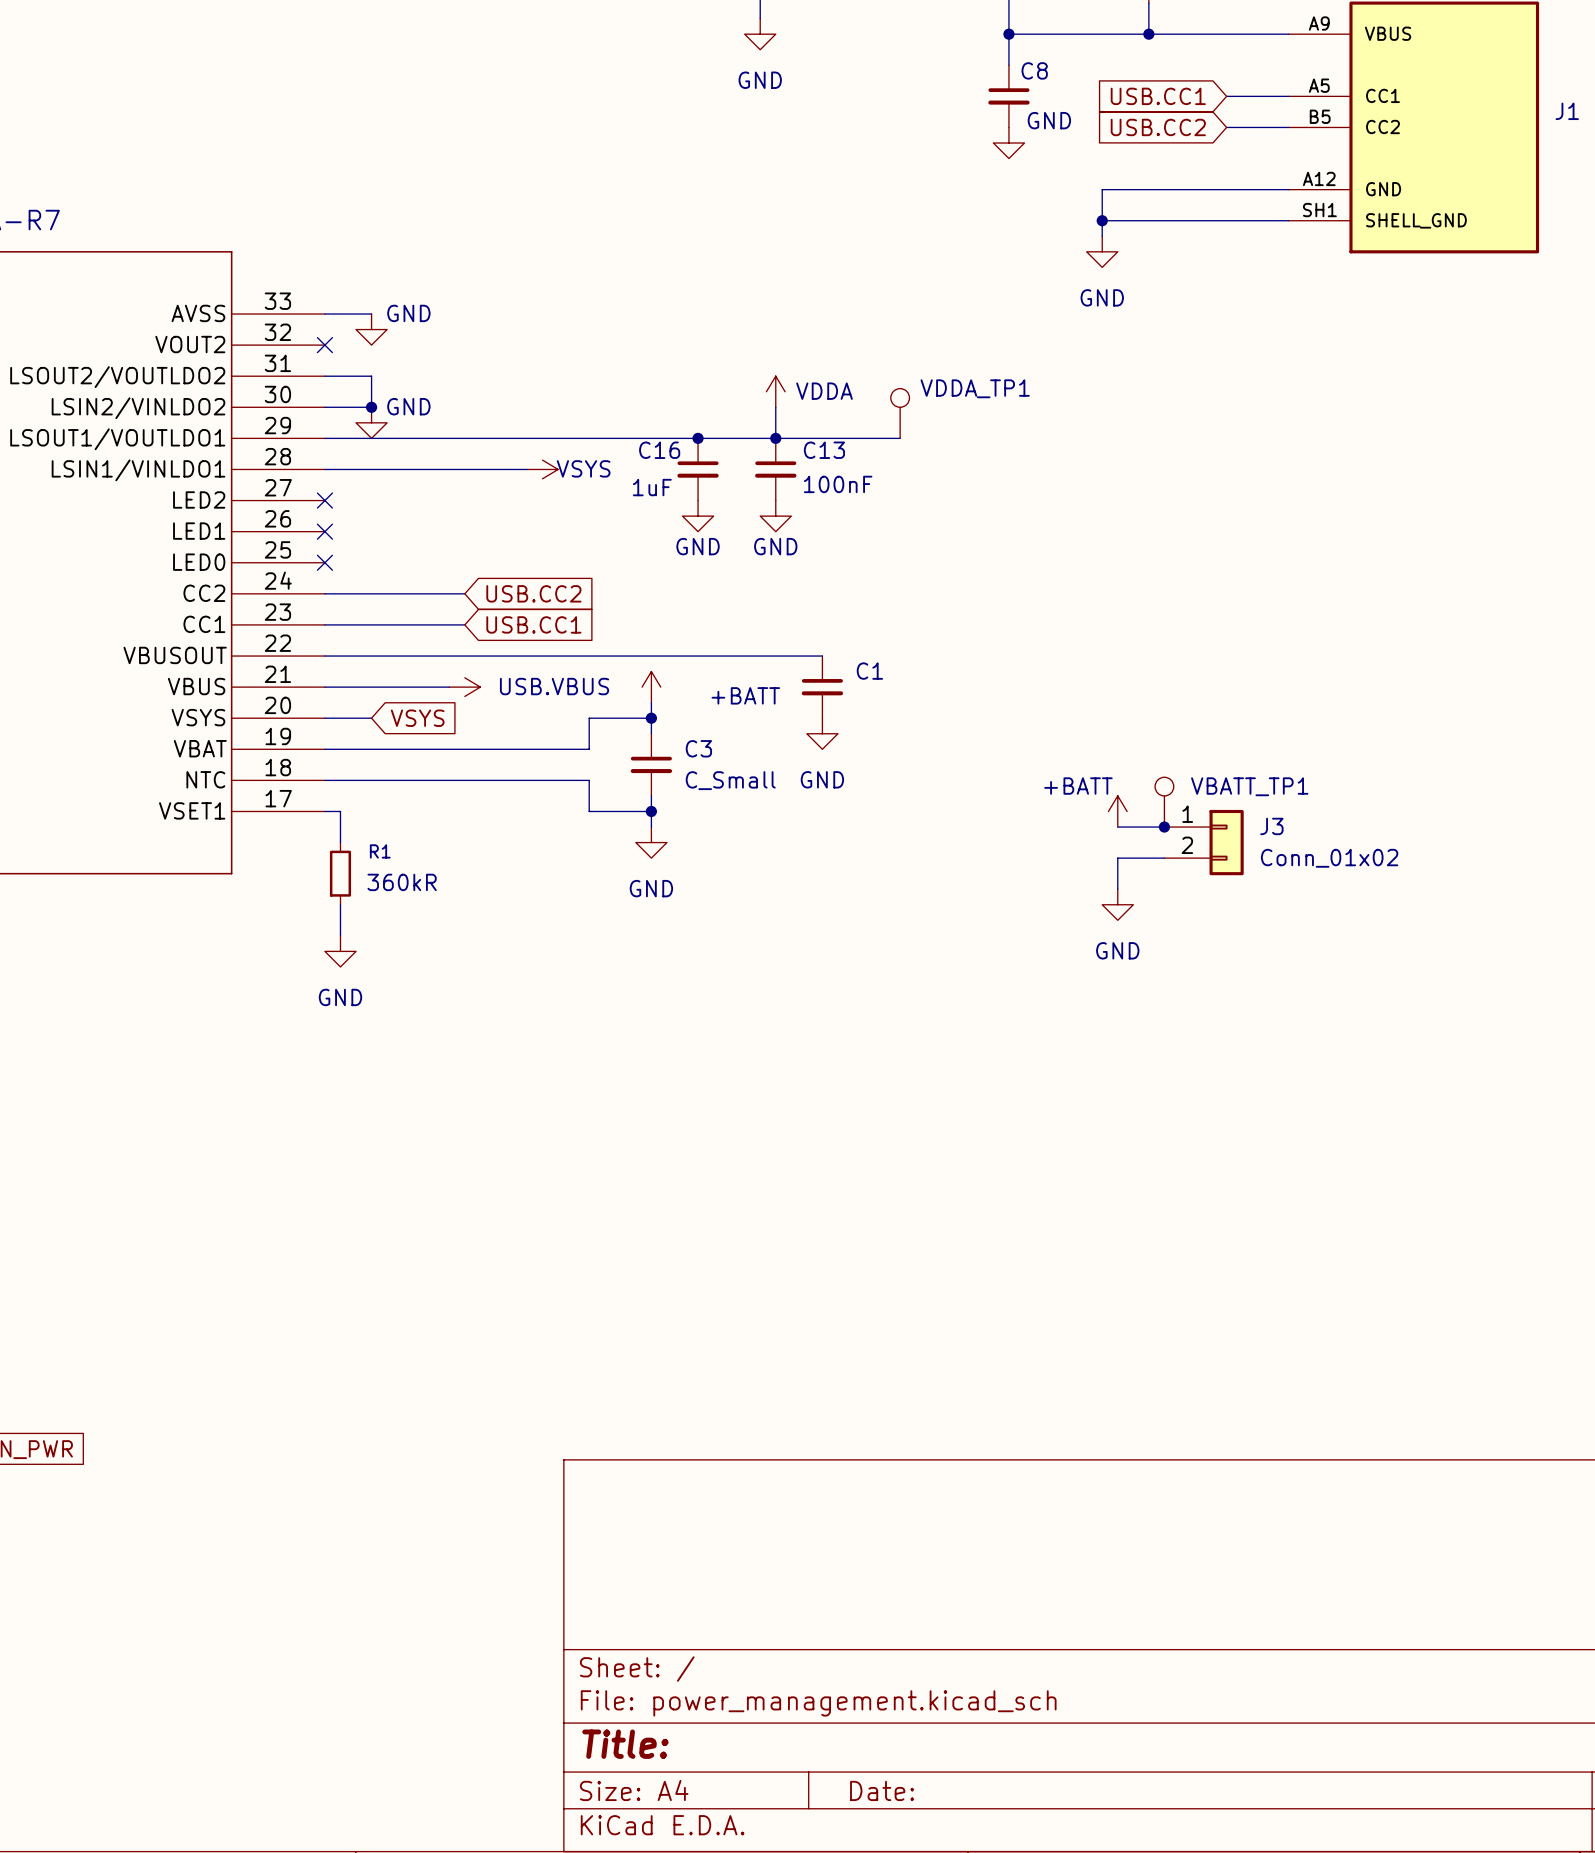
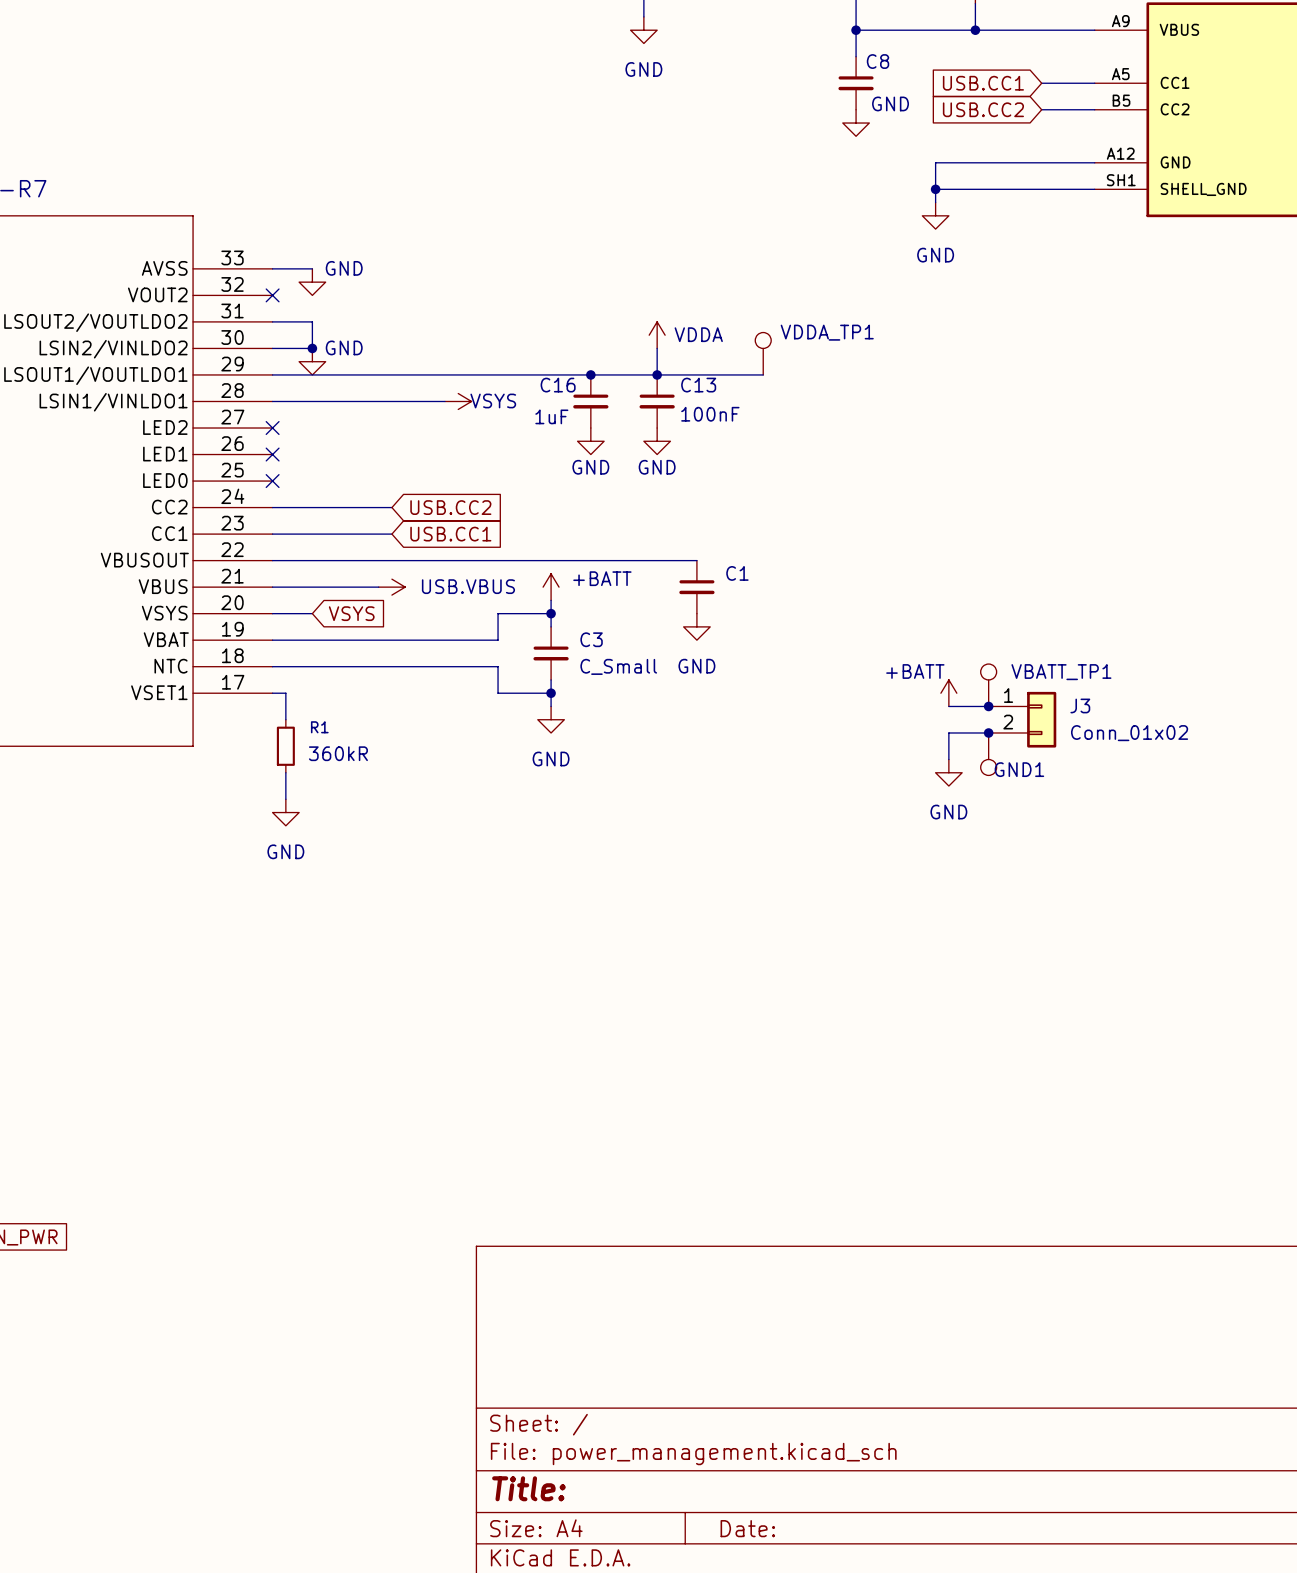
power symbol text position: +BATT (745, 695) -> +BATT (602, 578)
junction: none -> (988, 732)
GND1: none -> (988, 754)

